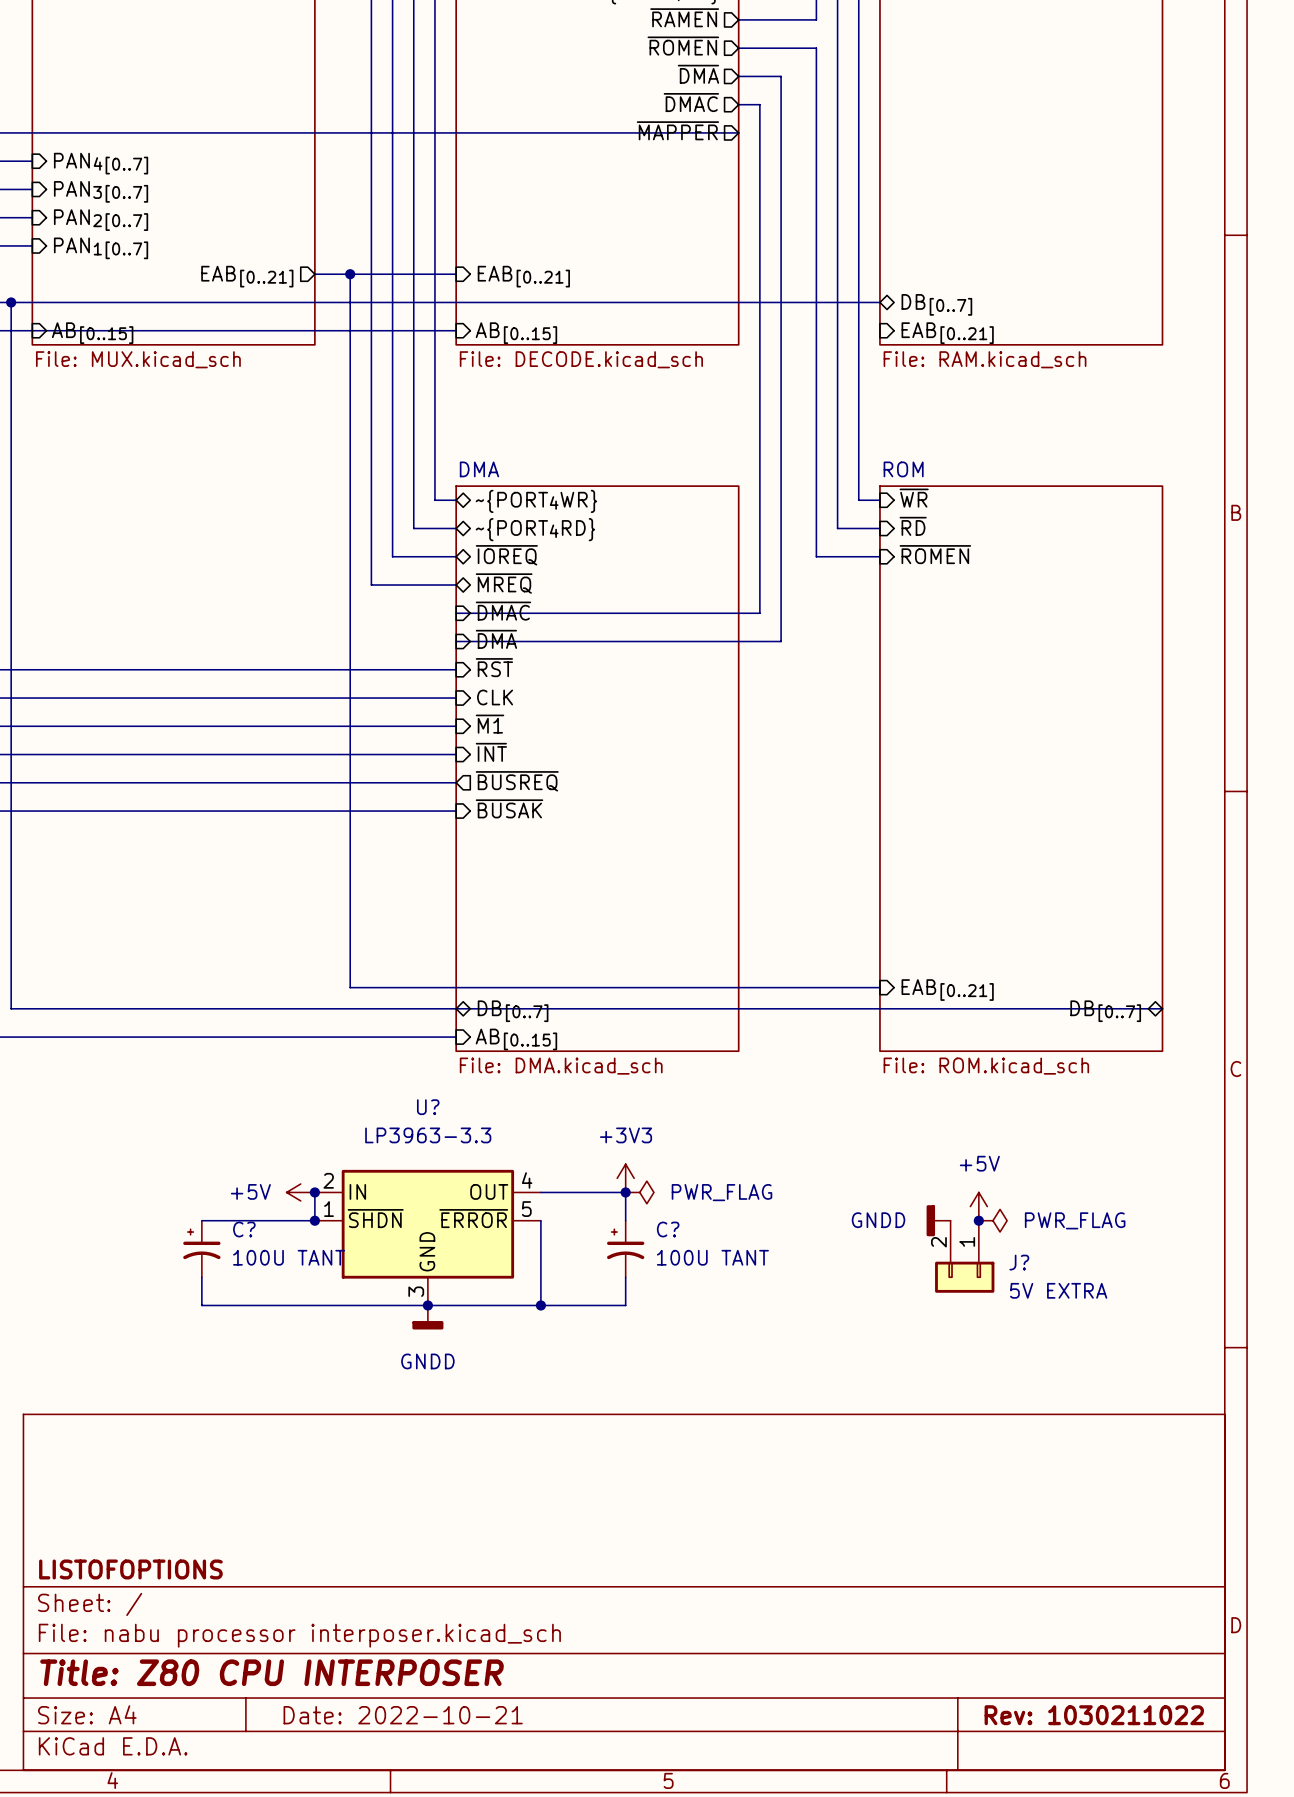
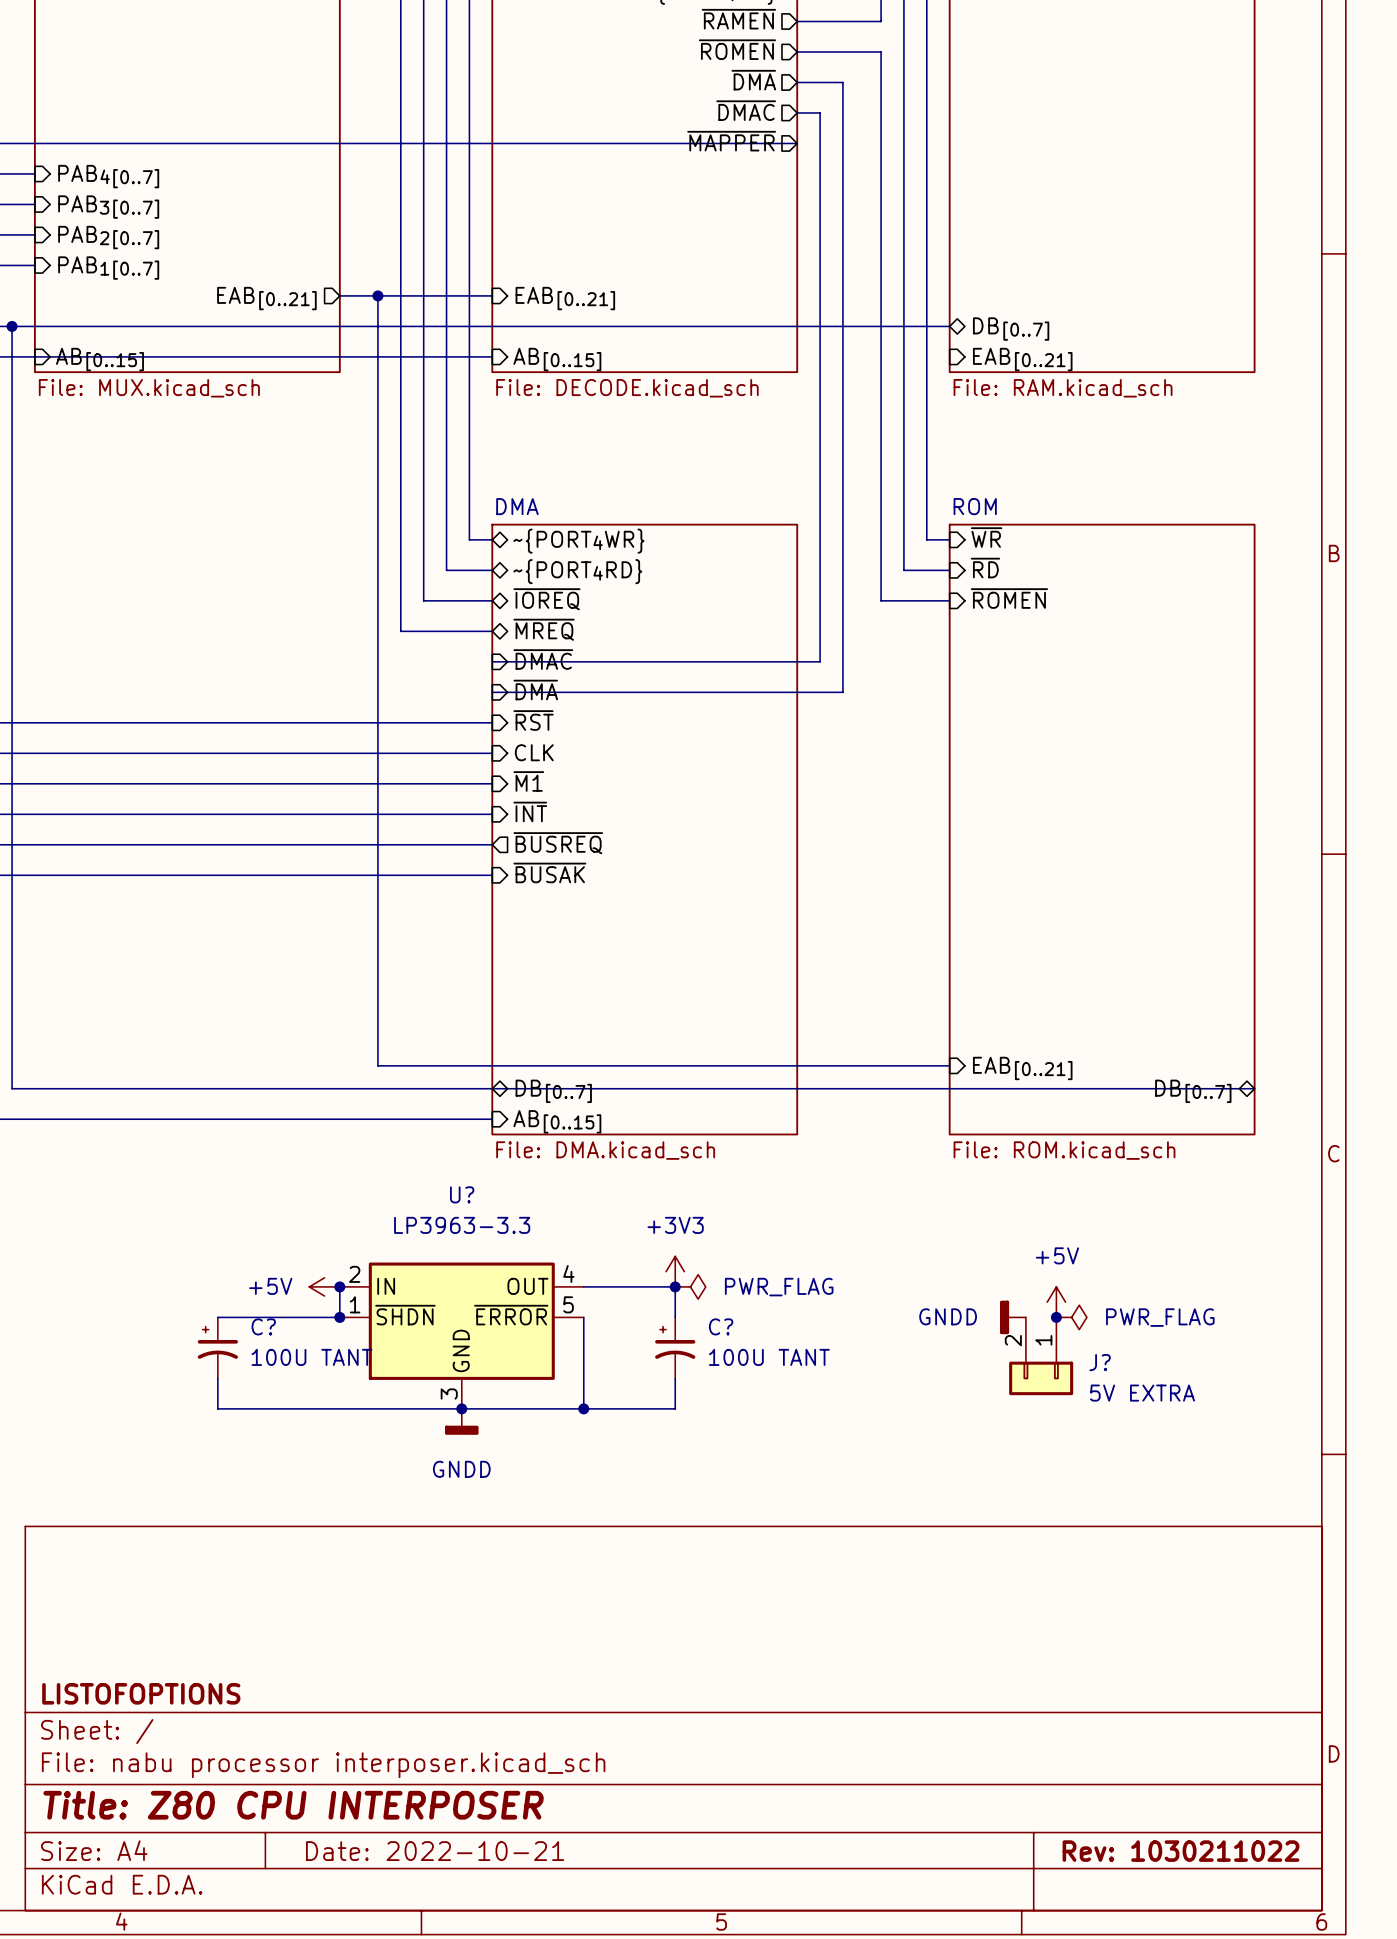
sheet pin: PAN4[0..7] (101, 163) -> PAB4[0..7] (108, 176)
sheet pin: PAN3[0..7] (101, 191) -> PAB3[0..7] (108, 207)
sheet pin: PAN2[0..7] (101, 220) -> PAB2[0..7] (108, 237)
sheet pin: PAN1[0..7] (101, 248) -> PAB1[0..7] (108, 268)

